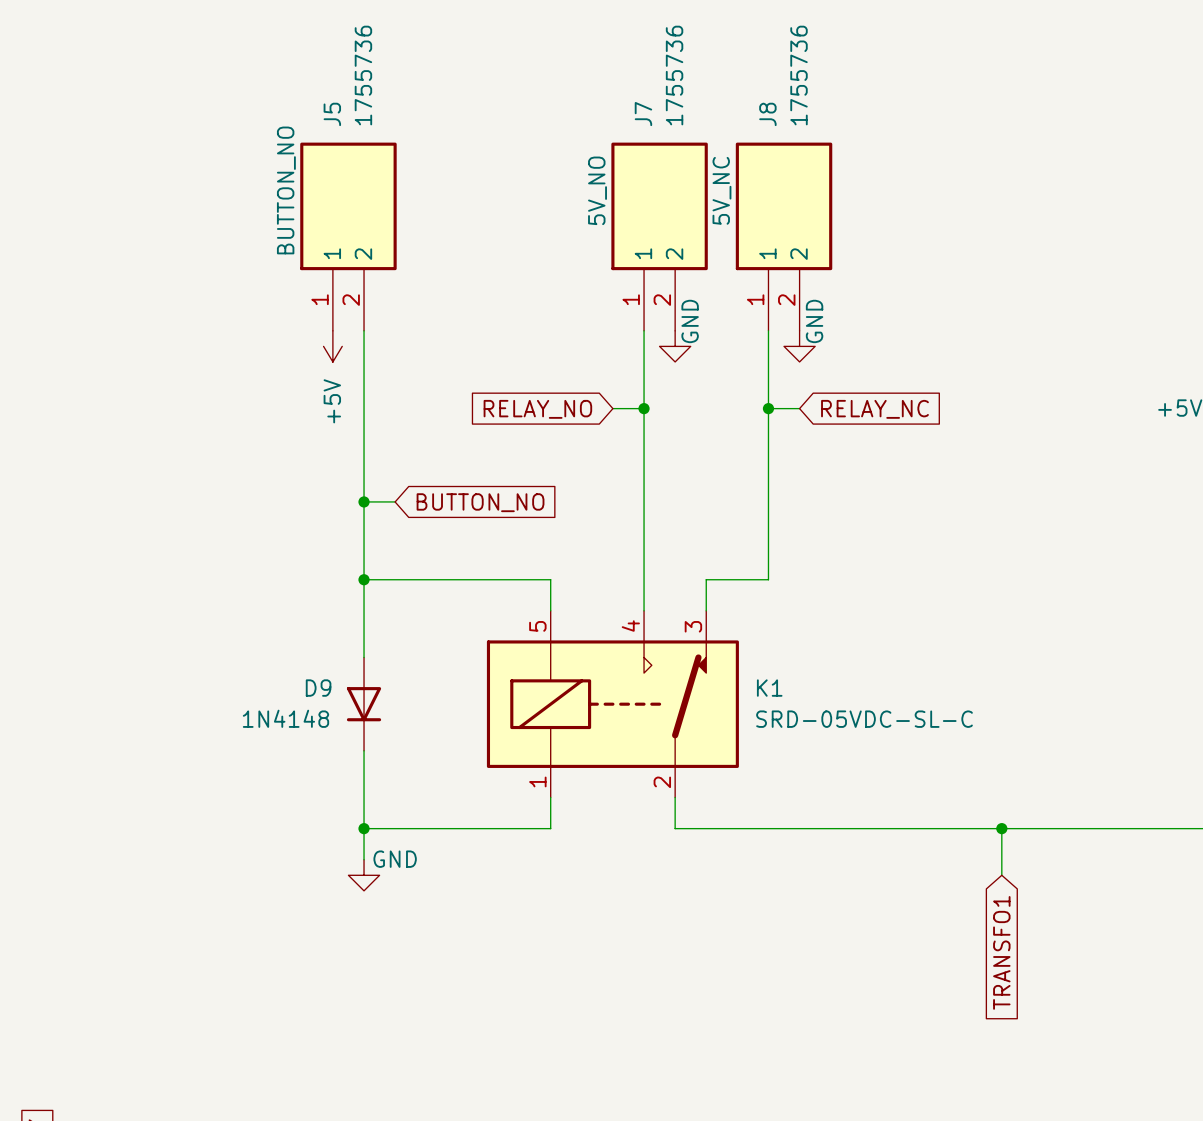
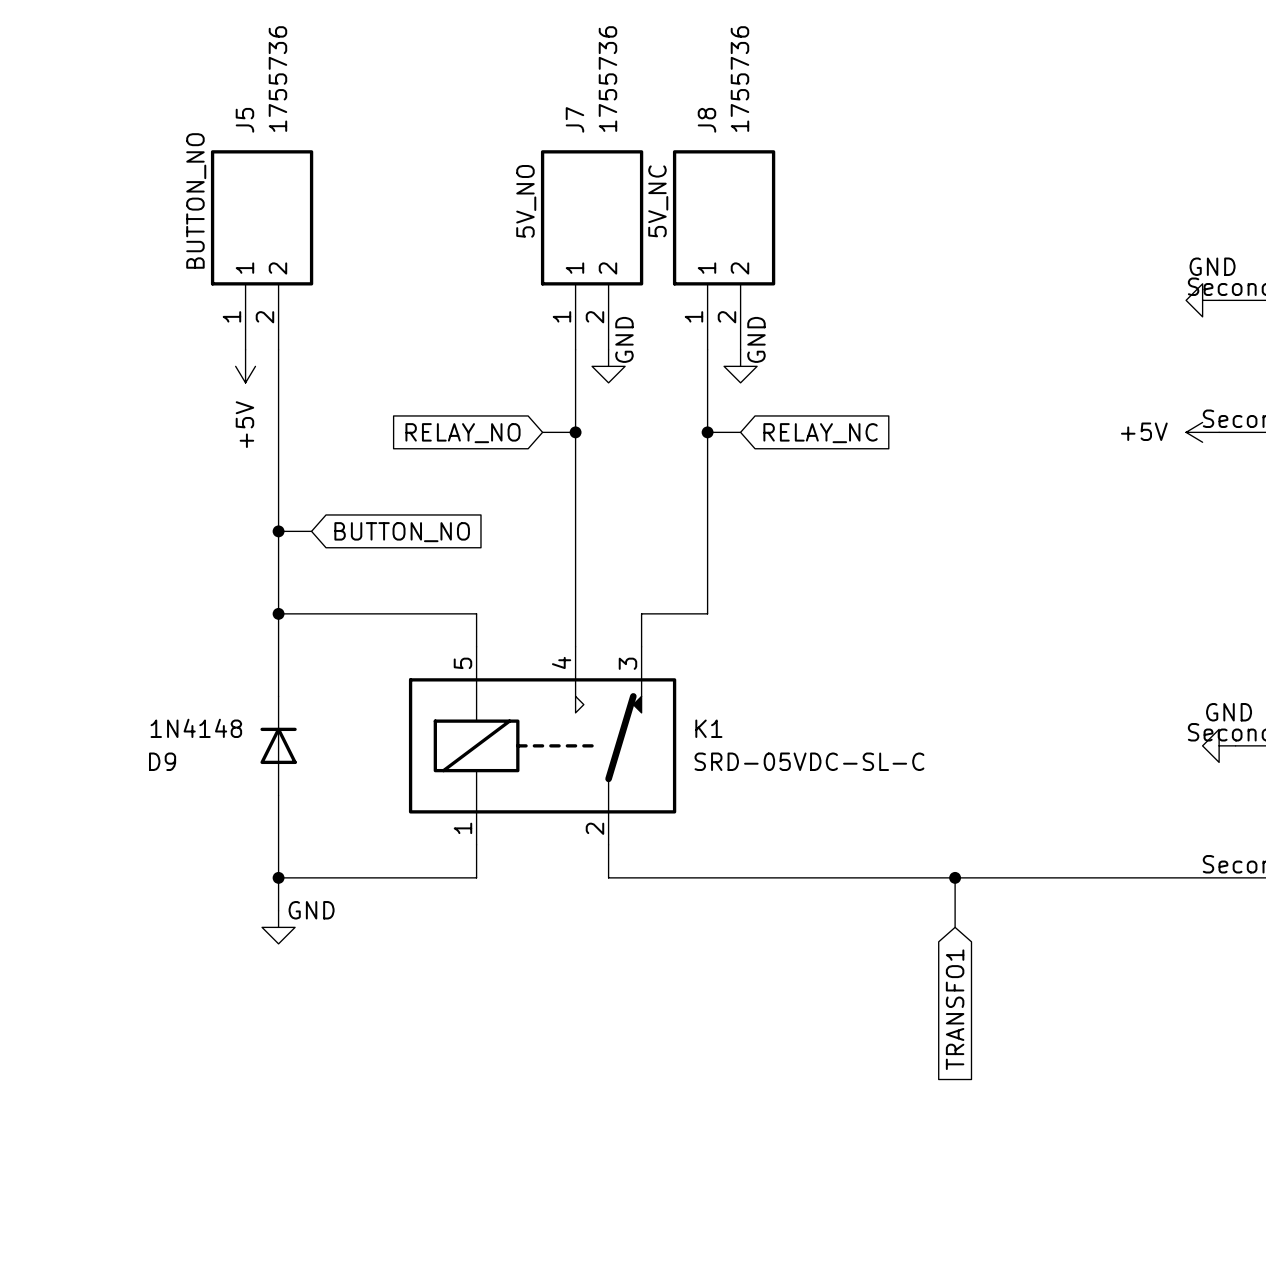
D9 name position: D9 (318, 688) -> D9 (162, 761)
D9 rotation: 0° (364, 704) -> 180° (278, 745)
D9 value position: 1N4148 (285, 718) -> 1N4148 (196, 728)

